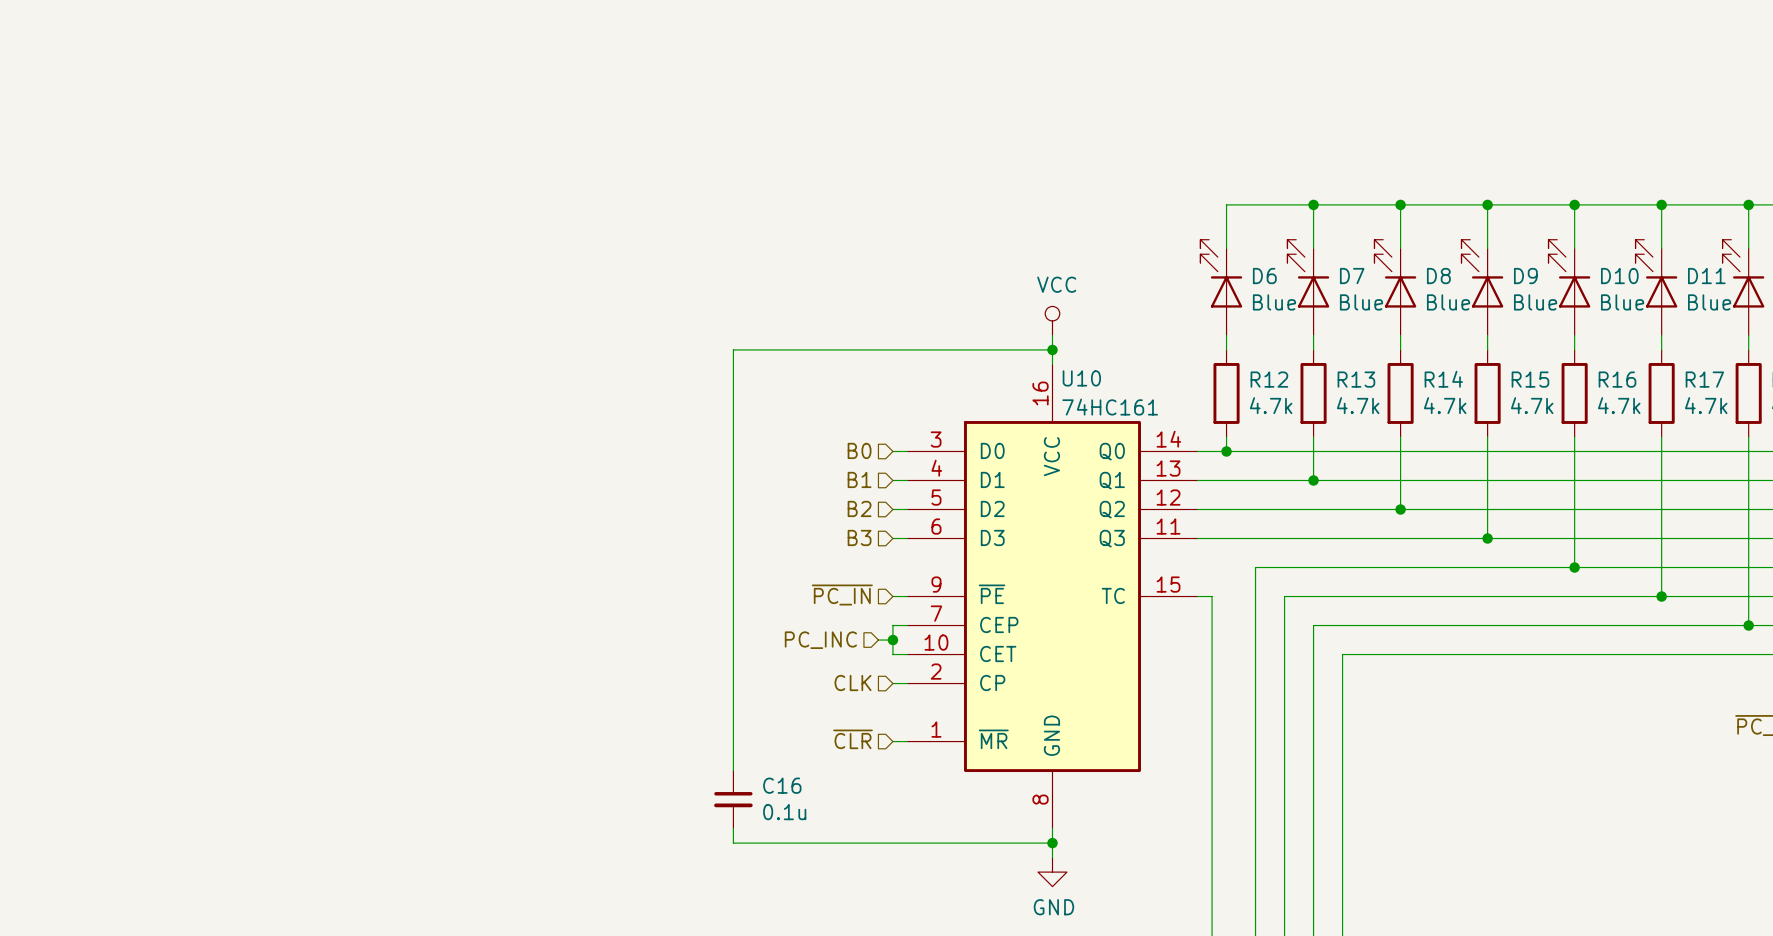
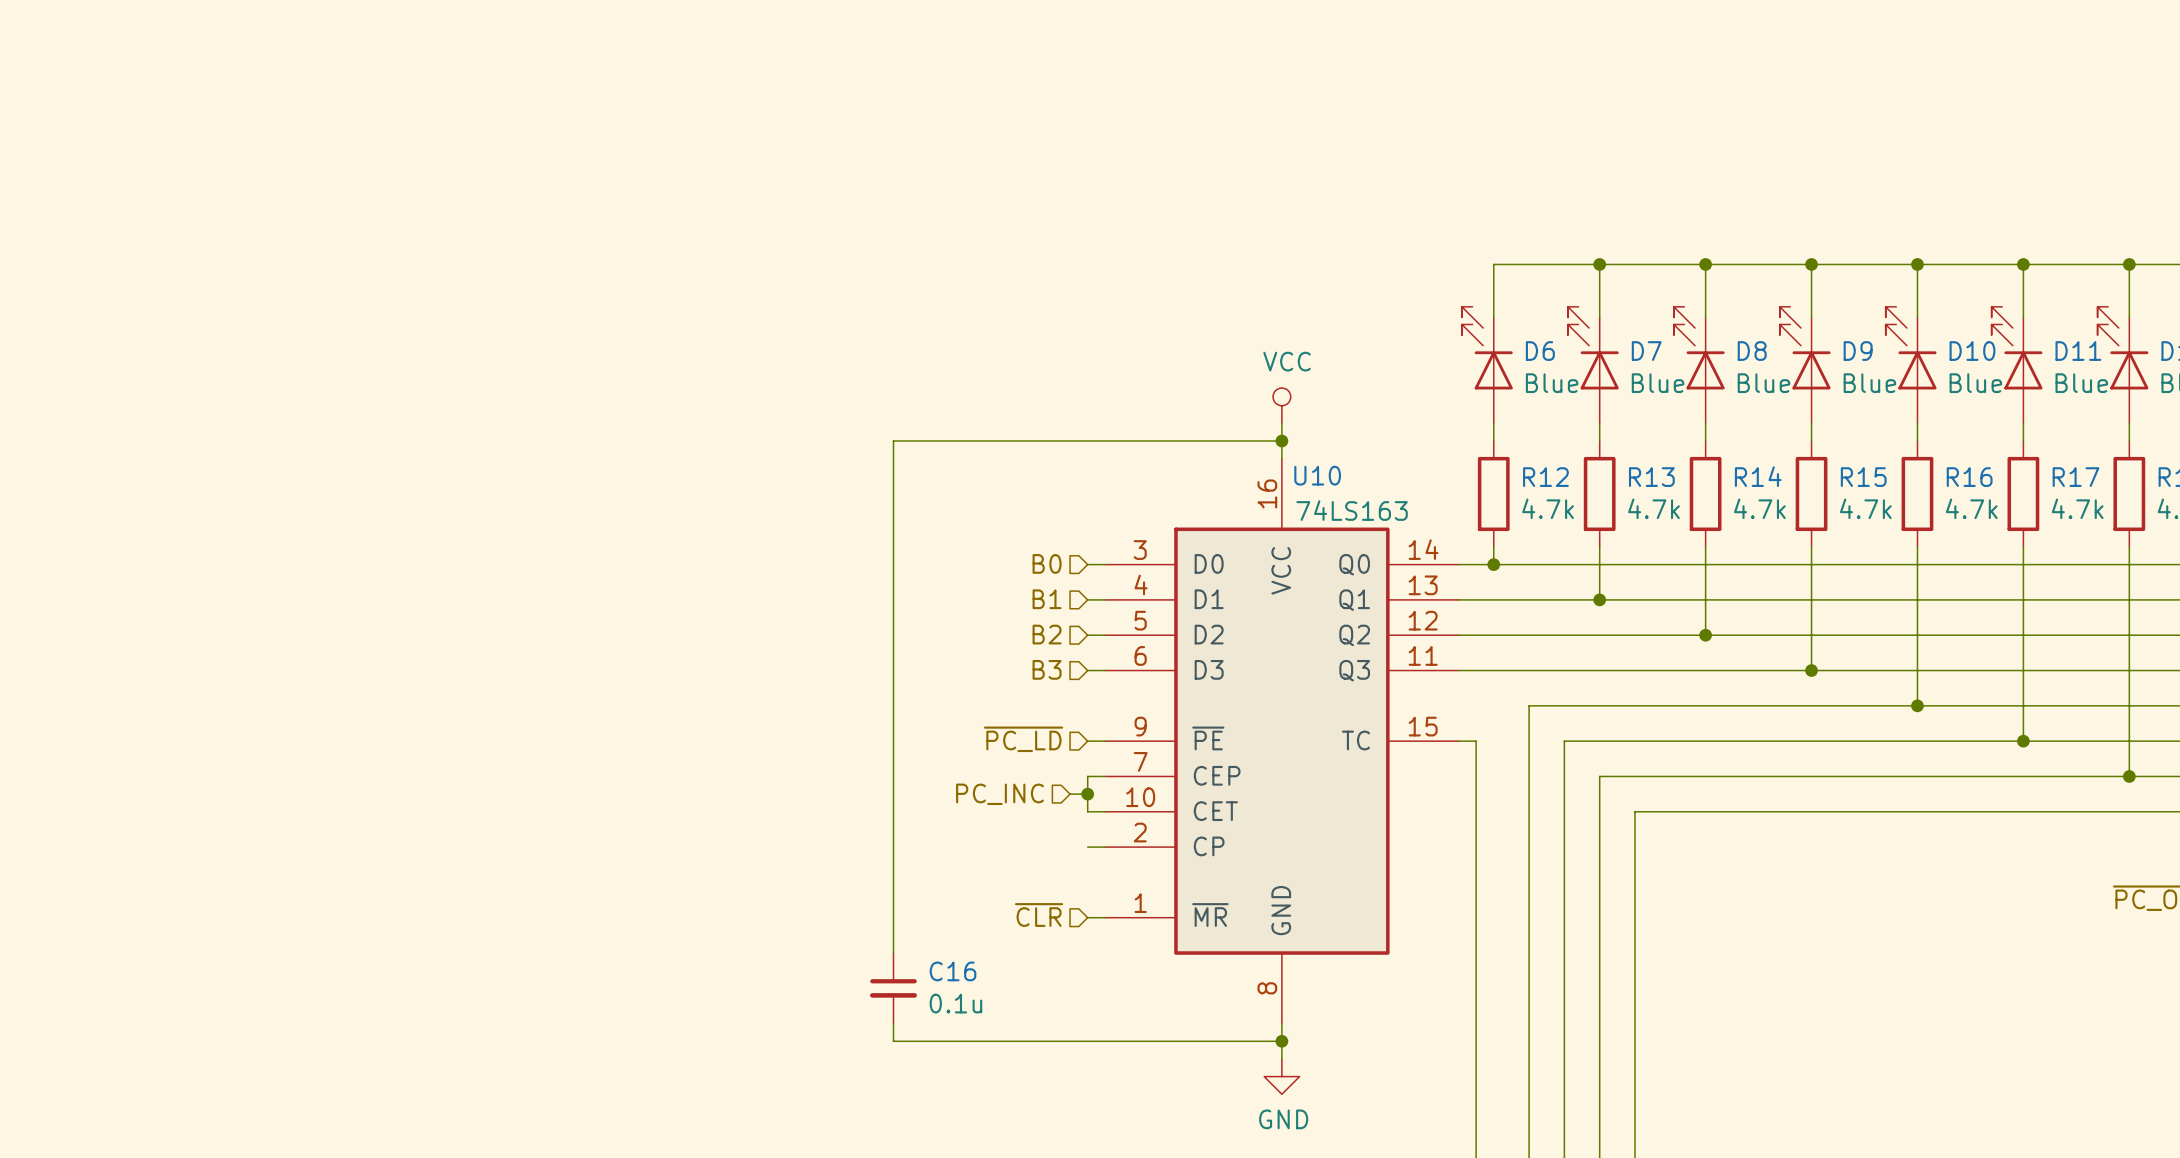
U10 value: 74HC161 (1110, 407) -> 74LS163 (1352, 510)
hierarchical label: ~{PC_IN} (842, 595) -> ~{PC_LD} (1023, 739)
hierarchical label: CLK (853, 683) -> none

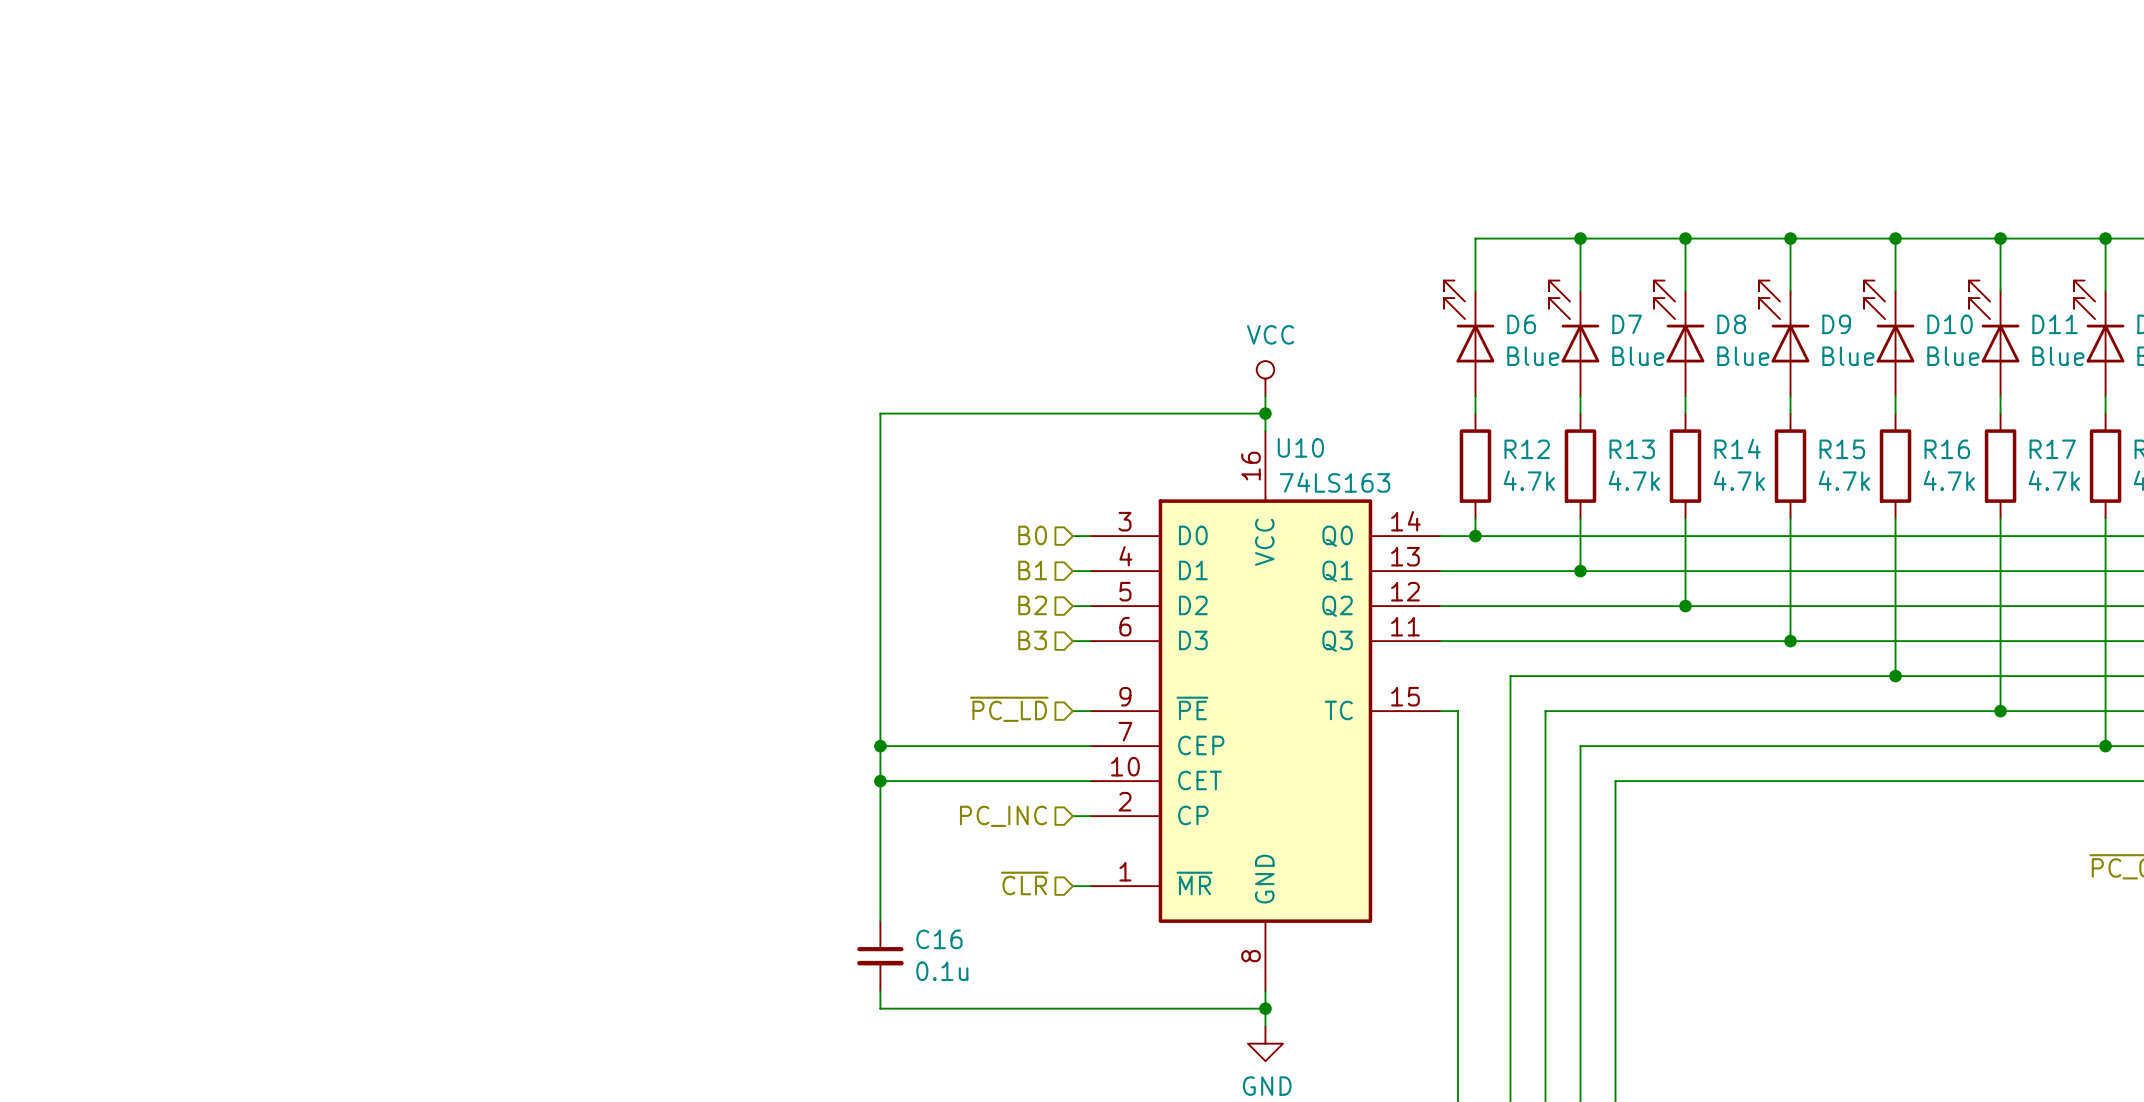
junction: none -> (880, 746)
wire: (1087, 776) (1087, 811) -> (1072, 746) (880, 746)
hierarchical label position: PC_INC (999, 794) -> PC_INC (1003, 816)
wire: (1070, 794) (1087, 794) -> none
junction: (1087, 794) -> none
wire: none -> (880, 781) (1072, 781)
junction: none -> (880, 781)

